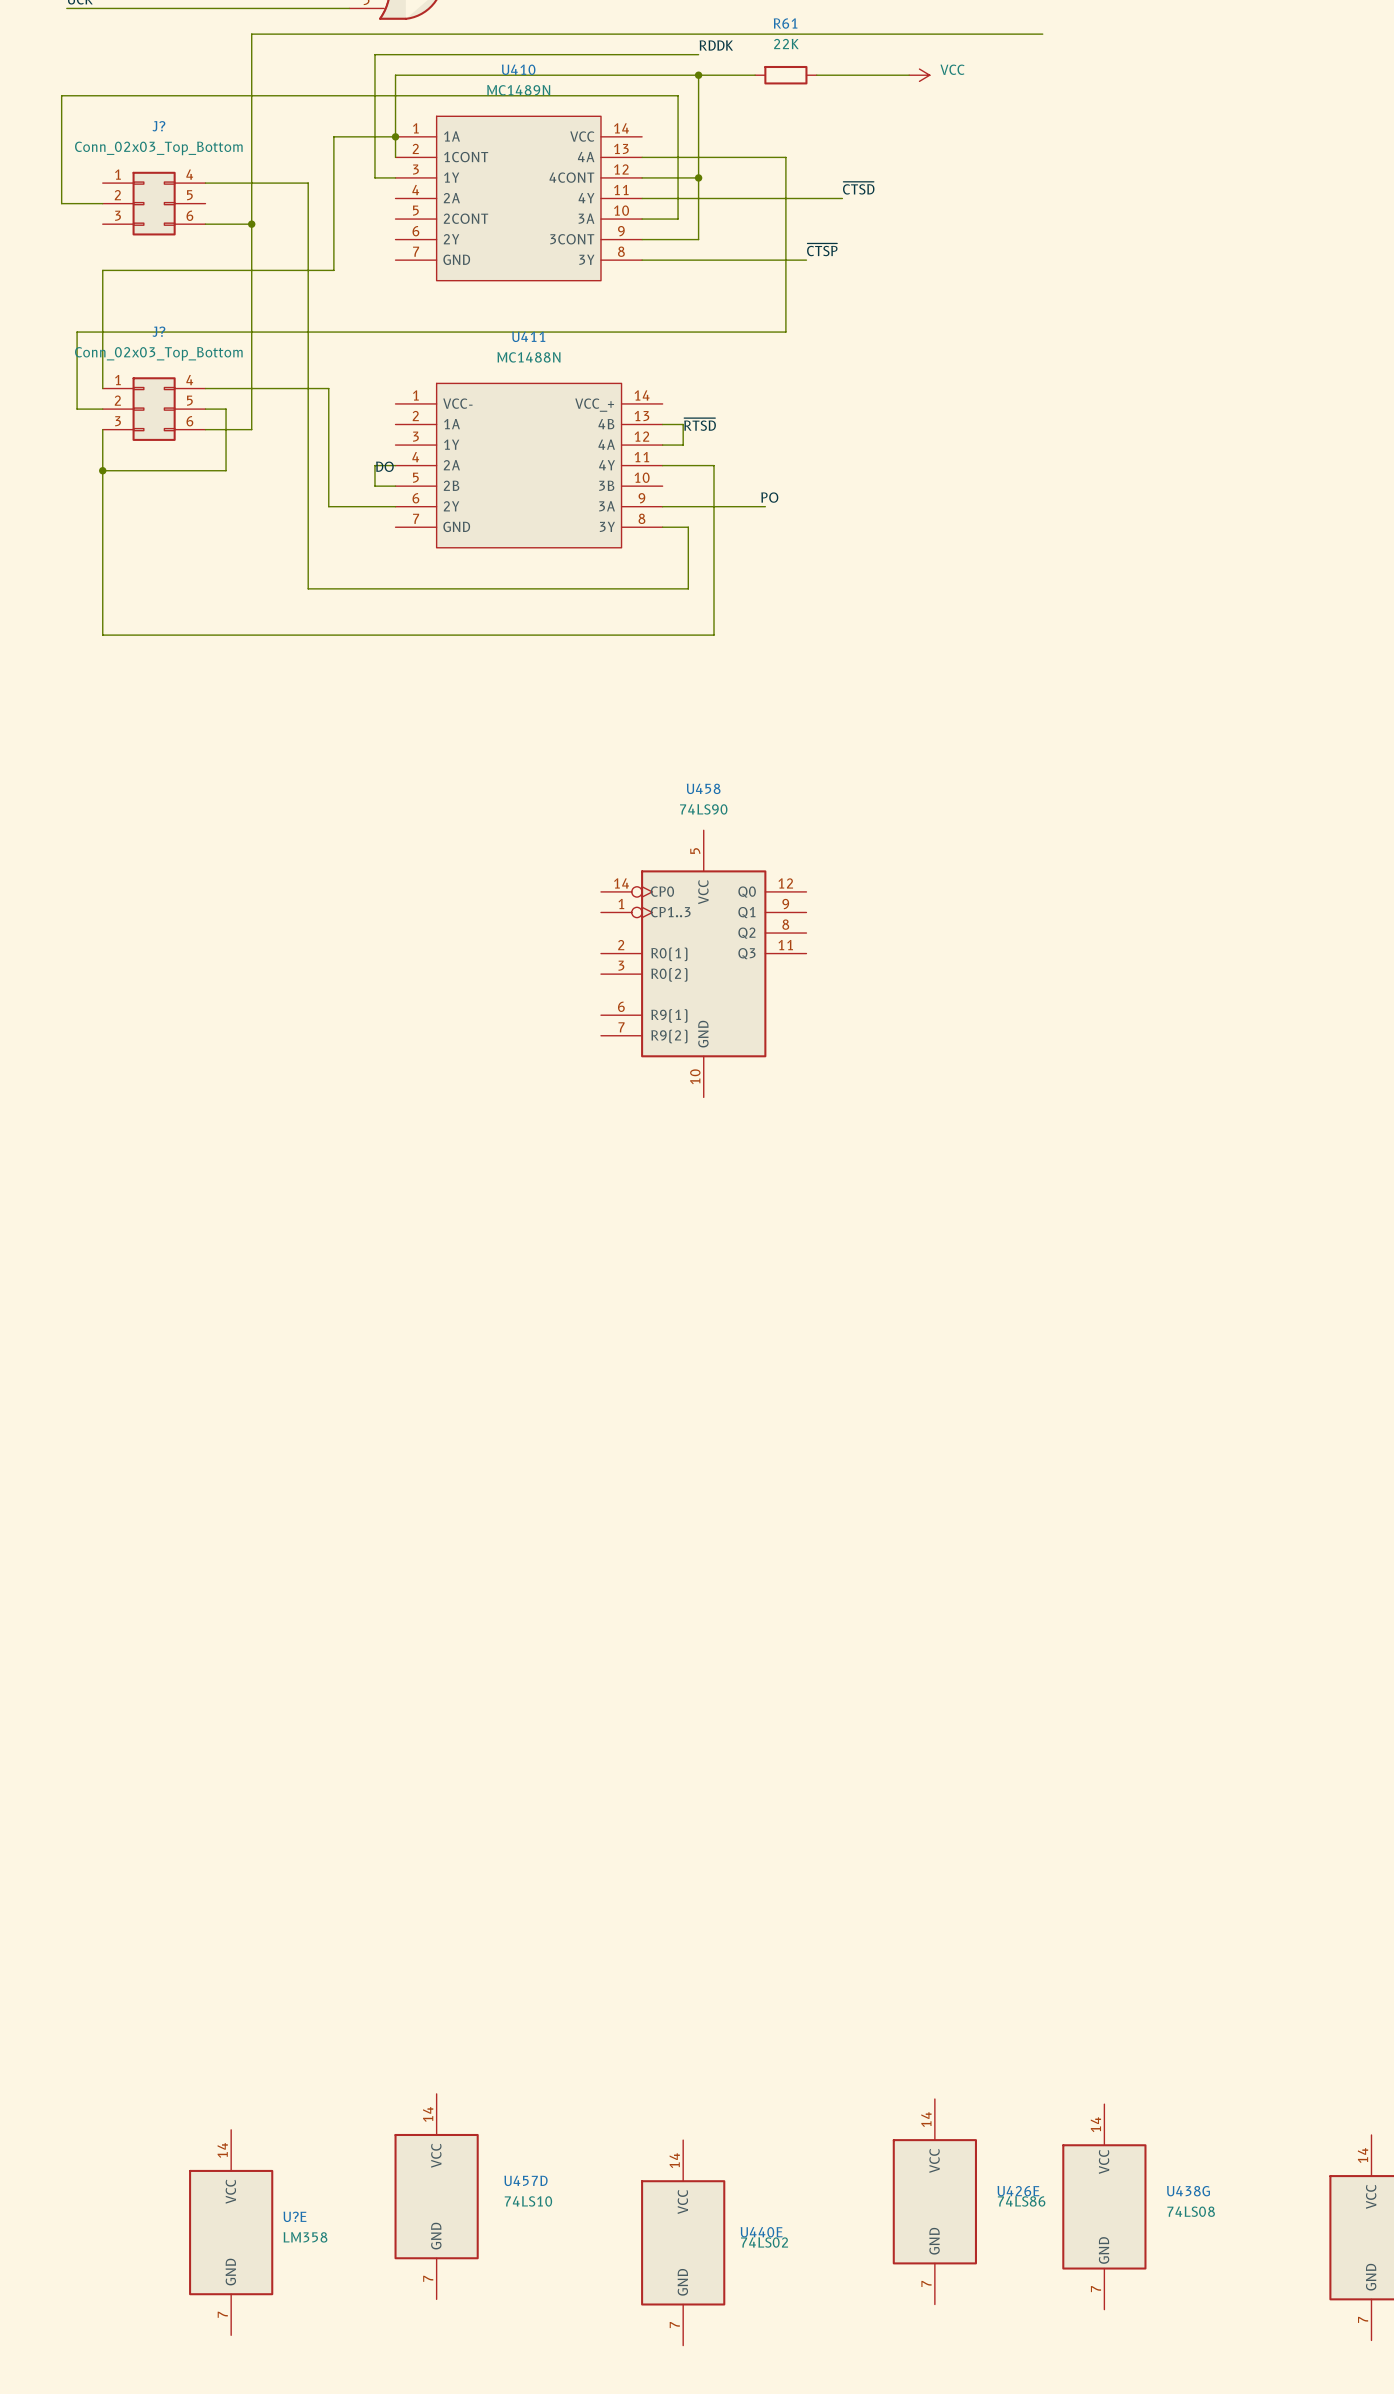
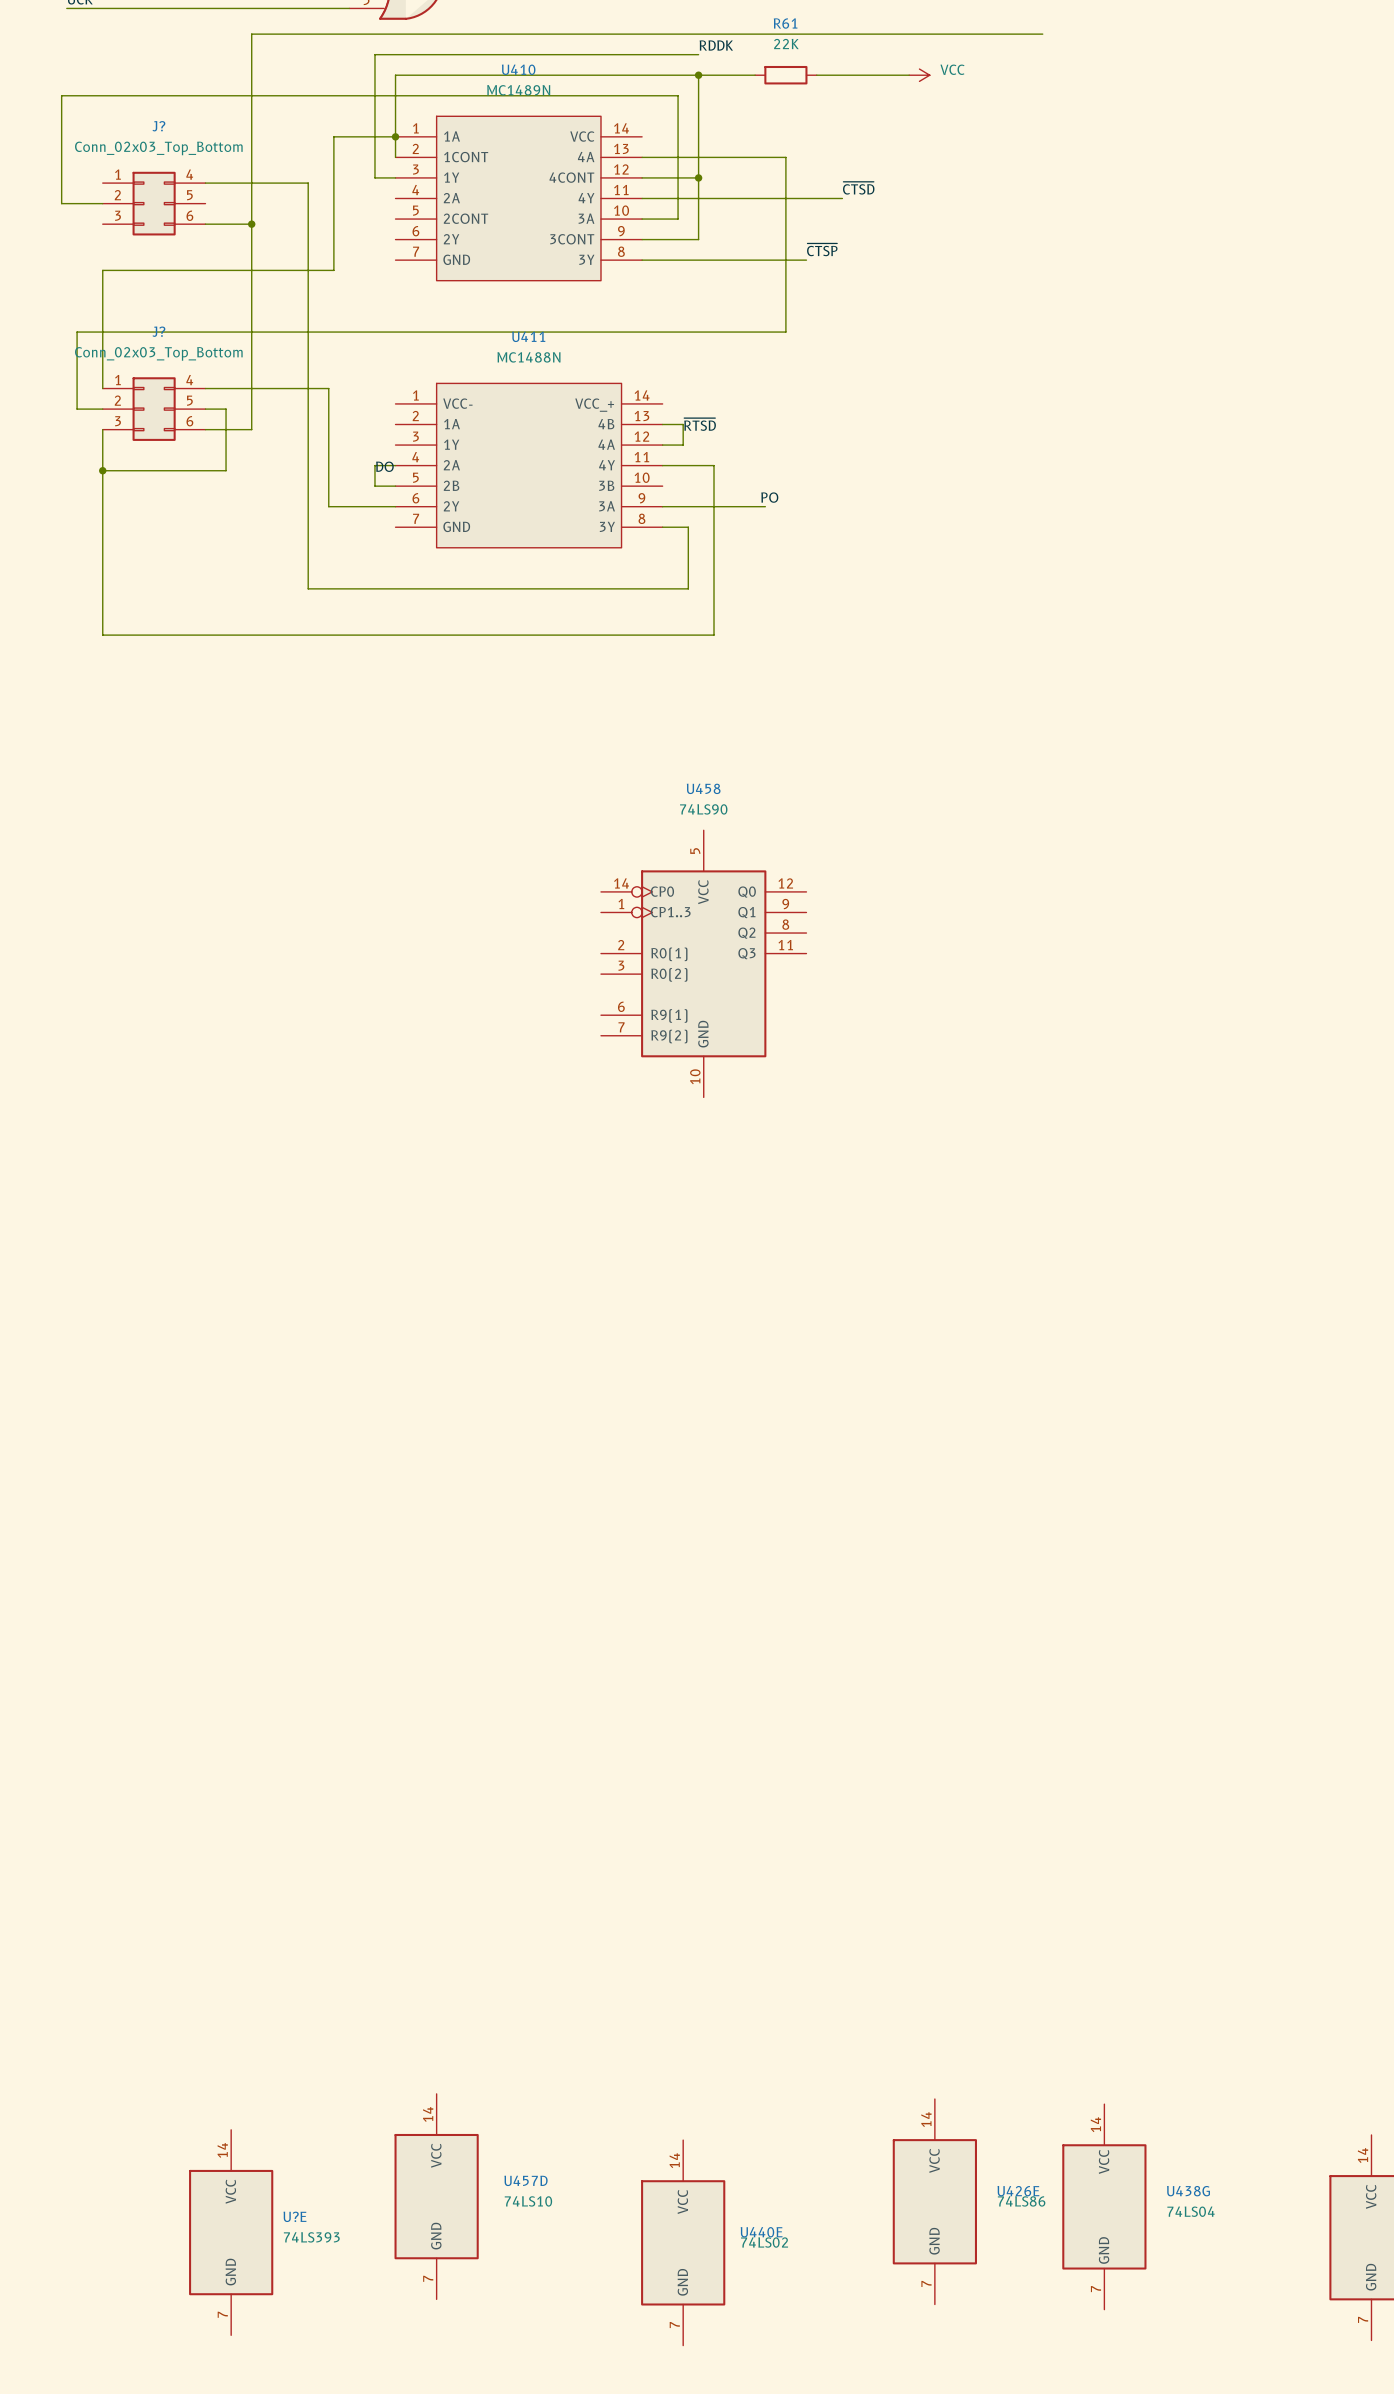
U438G value: 74LS08 (1191, 2211) -> 74LS04 (1191, 2211)
U?E value: LM358 (305, 2237) -> 74LS393 (311, 2237)

